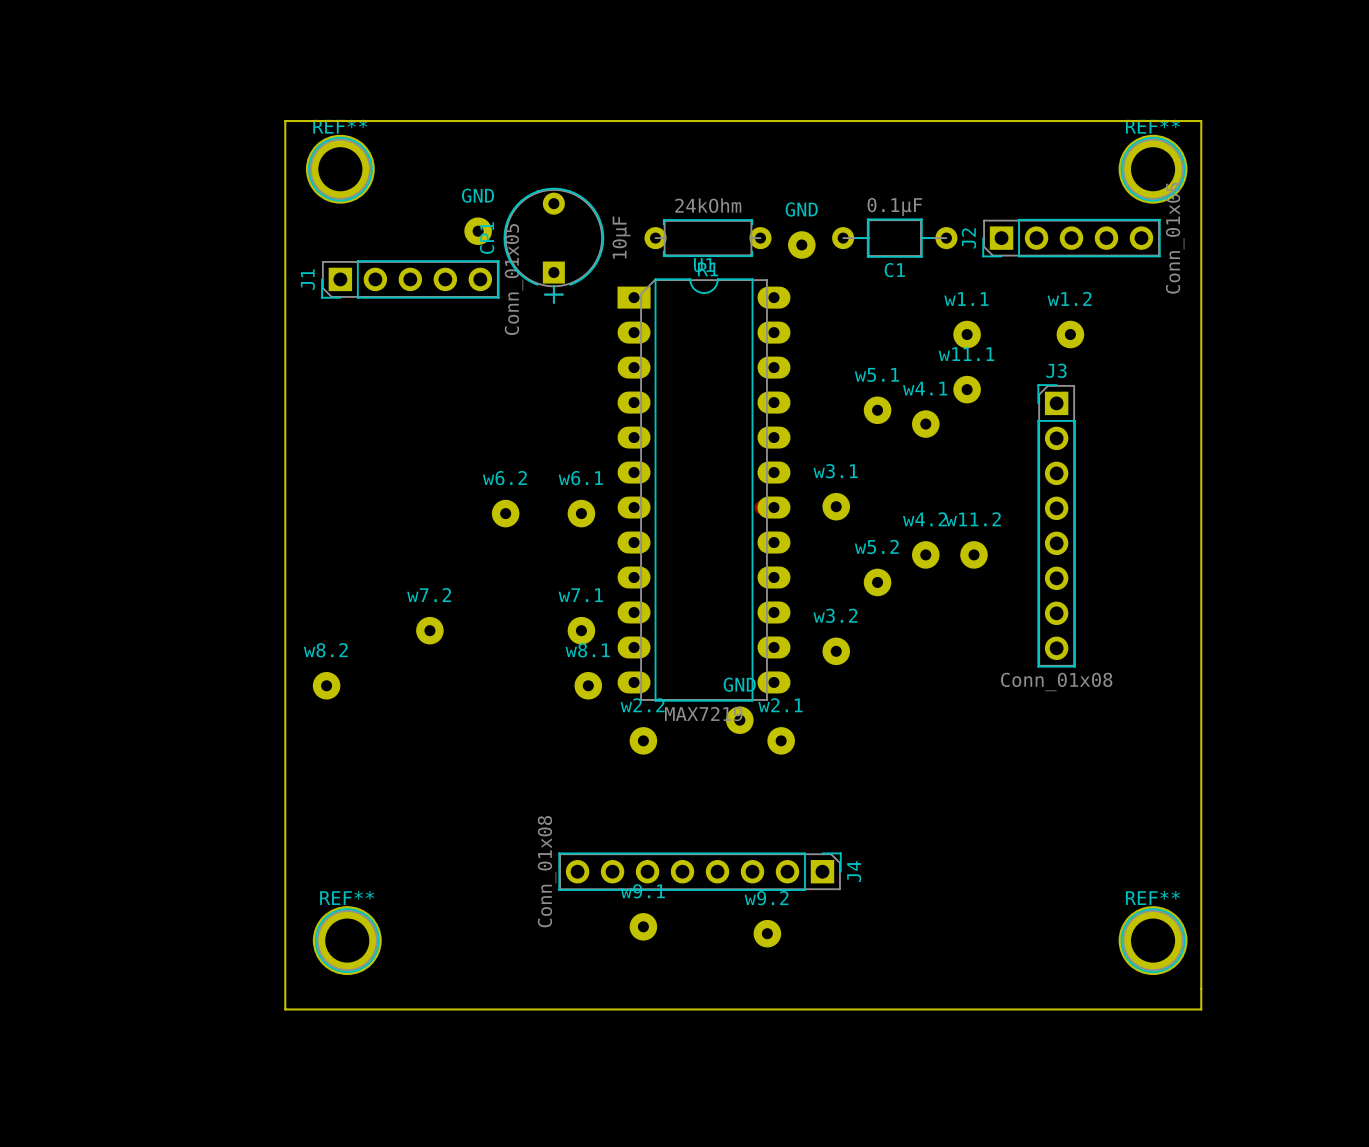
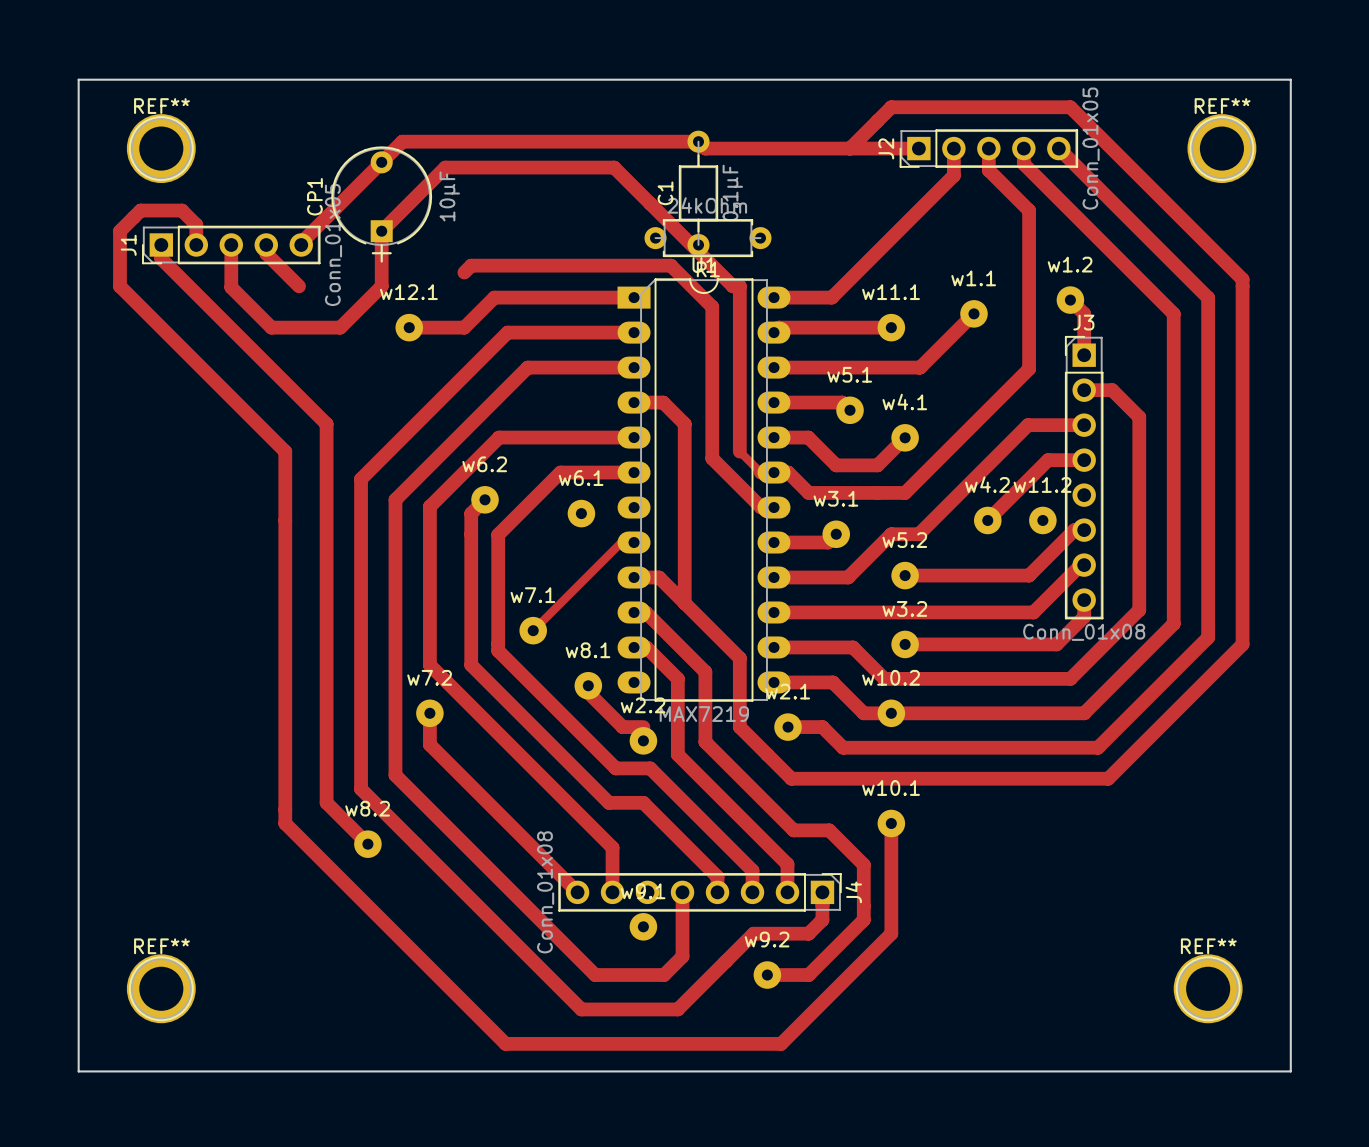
board edge: (285, 121) (285, 1009) (1201, 1009) (1201, 121) (285, 121) -> (78, 79) (78, 1071) (1290, 1071) (1290, 79) (78, 79)
track: none -> (850, 148) (891, 107) (1070, 107) (1242, 279) (1242, 644) (1108, 778) (791, 778) (739, 727) (739, 658) (659, 577) (634, 577)
track: none -> (918, 148) (705, 148) (698, 141) (402, 141) (301, 242) (301, 244)
track: none -> (953, 148) (953, 175) (831, 297) (773, 297) (773, 293)
track: none -> (988, 148) (988, 170) (1029, 210) (1029, 368) (905, 492) (808, 492) (788, 472) (760, 472) (739, 451) (739, 286) (732, 286) (614, 167) (445, 167) (381, 231) (381, 286) (340, 327) (271, 327) (231, 287) (231, 244)
track: none -> (1023, 148) (1023, 164) (1173, 313) (1173, 623) (1084, 713) (863, 713) (832, 682) (773, 682)
track: none -> (1058, 148) (1208, 297) (1208, 637) (1097, 747) (843, 747) (822, 727) (788, 727)
REF** position: (340, 169) -> (161, 148)
REF** position: (1153, 169) -> (1221, 148)
GND: (478, 231) -> none
C1 rotation: 0° (894, 238) -> 90° clockwise (698, 193)
C1 position: (894, 238) -> (698, 193)
J2 position: (1071, 238) -> (988, 148)
track: none -> (161, 244) (161, 258) (326, 424) (326, 802) (367, 844)
track: none -> (196, 244) (196, 224) (181, 210) (140, 210) (119, 231) (119, 286) (285, 451) (285, 823) (505, 1043) (781, 1043) (891, 933) (891, 823)
track: none -> (266, 244) (266, 253) (299, 286)
GND: (801, 244) -> none
CP1 position: (553, 245) -> (381, 204)
track: none -> (464, 272) (471, 265) (670, 265) (712, 306) (712, 458) (761, 507)
J1 position: (410, 279) -> (231, 244)
track: none -> (634, 297) (494, 297) (464, 327) (409, 327)
track: none -> (1070, 300) (1084, 313) (1084, 355)
track: none -> (973, 313) (920, 367) (773, 367)
w12.1: none -> (409, 327)
track: none -> (891, 327) (778, 327) (773, 332)
track: none -> (634, 332) (507, 332) (361, 479) (361, 789) (581, 1009) (677, 1009) (753, 933) (808, 933) (822, 919) (822, 892)
w1.1 position: (967, 334) -> (973, 313)
w1.2 position: (1070, 334) -> (1070, 300)
track: none -> (634, 367) (527, 367) (395, 499) (395, 775) (595, 975) (664, 975) (682, 956) (682, 892)
w11.1 position: (967, 389) -> (891, 327)
track: none -> (1084, 390) (1112, 390) (1139, 417) (1139, 610) (1070, 678) (884, 678) (853, 647) (773, 647)
track: none -> (634, 402) (663, 402) (684, 424) (684, 603)
track: none -> (773, 402) (842, 402) (850, 410)
w5.1 position: (877, 410) -> (850, 410)
w4.1 position: (925, 424) -> (905, 437)
track: none -> (1084, 425) (1027, 425) (918, 534) (891, 534) (848, 577) (773, 577)
track: none -> (634, 437) (499, 437) (429, 506) (429, 665) (612, 847) (612, 892)
track: none -> (773, 437) (808, 437) (836, 465) (877, 465) (905, 437)
track: none -> (1084, 460) (1048, 460) (987, 520)
track: none -> (634, 472) (560, 472) (498, 534) (498, 650) (615, 768) (650, 768) (752, 870) (752, 892)
track: none -> (485, 499) (471, 513) (471, 665) (608, 802) (643, 802) (717, 876) (717, 892)
w3.1 position: (836, 506) -> (836, 534)
w6.2 position: (505, 513) -> (485, 499)
J3 position: (1056, 525) -> (1084, 477)
track: none -> (1084, 530) (1074, 530) (1029, 575) (905, 575)
track: none -> (836, 534) (827, 542) (773, 542)
track: none -> (621, 542) (533, 630)
w4.2 position: (925, 554) -> (987, 520)
w11.2 position: (973, 554) -> (1042, 520)
track: none -> (1084, 565) (1080, 565) (1033, 612) (773, 612)
w5.2 position: (877, 582) -> (905, 575)
track: none -> (1084, 600) (1084, 616) (1056, 644) (905, 644)
track: none -> (634, 612) (645, 612) (705, 671) (705, 742) (793, 830) (829, 830) (863, 864) (863, 919) (808, 975) (767, 975)
w7.2 position: (429, 630) -> (429, 713)
w7.1 position: (581, 630) -> (533, 630)
track: none -> (634, 647) (646, 647) (677, 678) (677, 754) (787, 864) (787, 892)
w3.2 position: (836, 651) -> (905, 644)
track: none -> (588, 682) (588, 692) (622, 727) (643, 727)
w8.2 position: (326, 685) -> (367, 844)
track: none -> (429, 713) (429, 744) (577, 892)
w10.2: none -> (891, 713)
GND: (739, 720) -> none
w2.1 position: (781, 740) -> (788, 727)
w10.1: none -> (891, 823)
J4 position: (700, 871) -> (700, 892)
w9.2 position: (767, 933) -> (767, 975)
REF** position: (347, 940) -> (161, 988)
REF** position: (1153, 940) -> (1208, 988)

